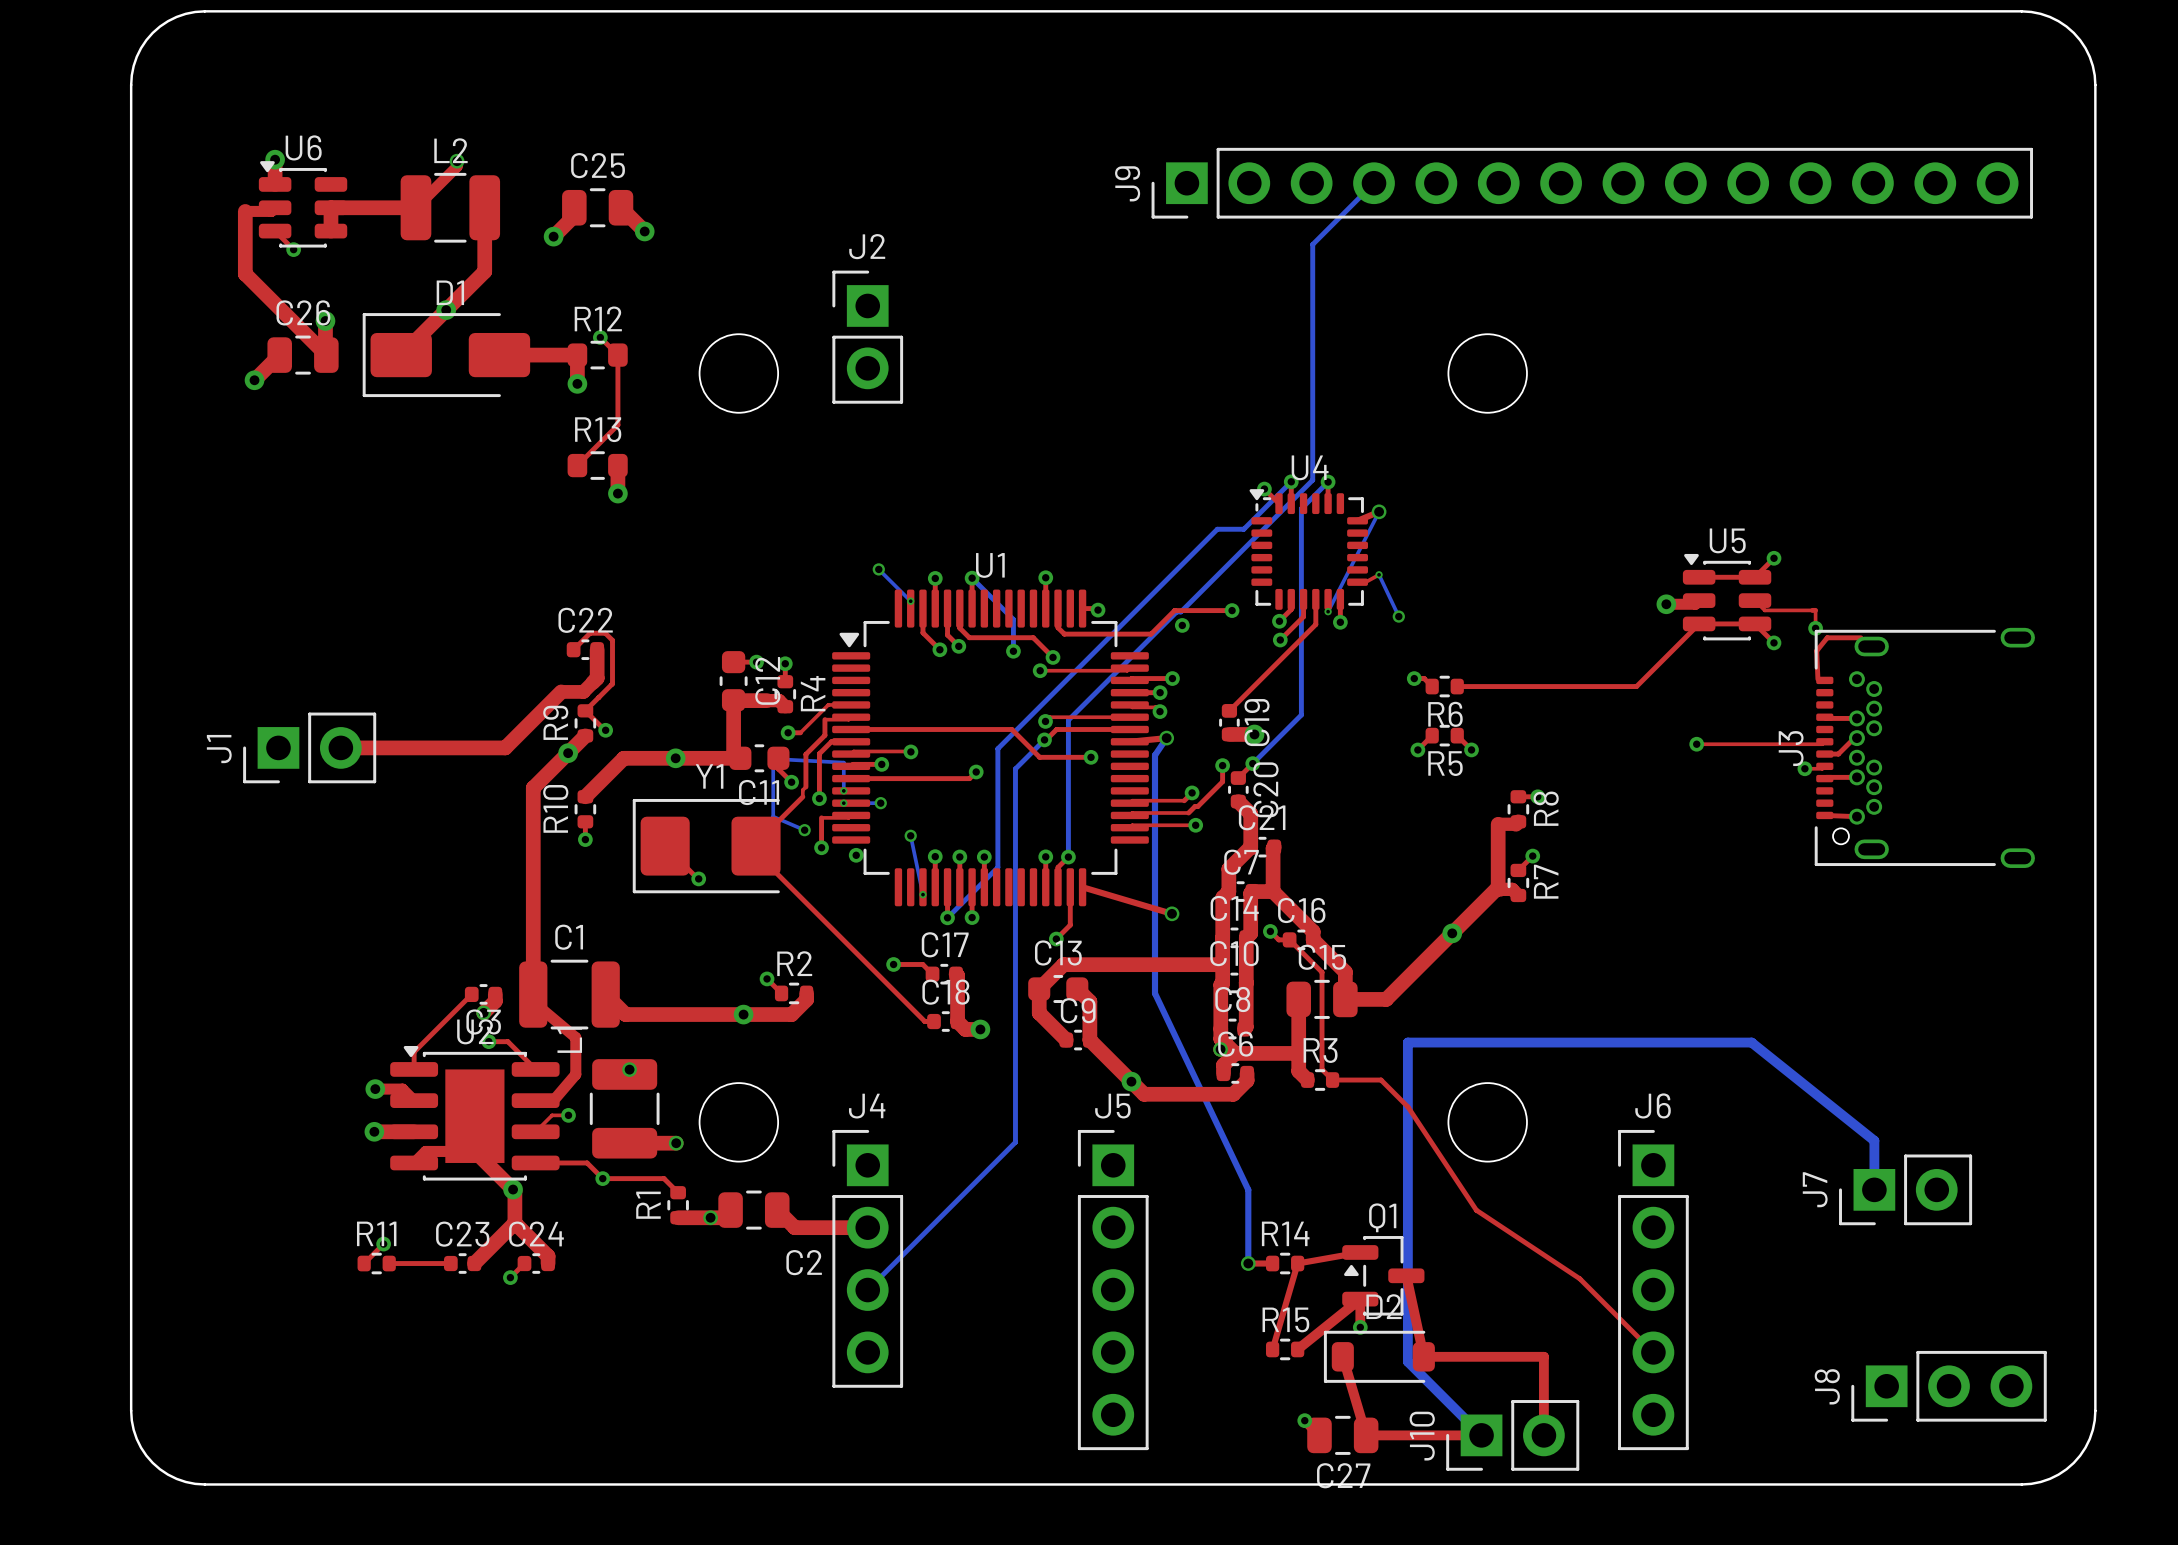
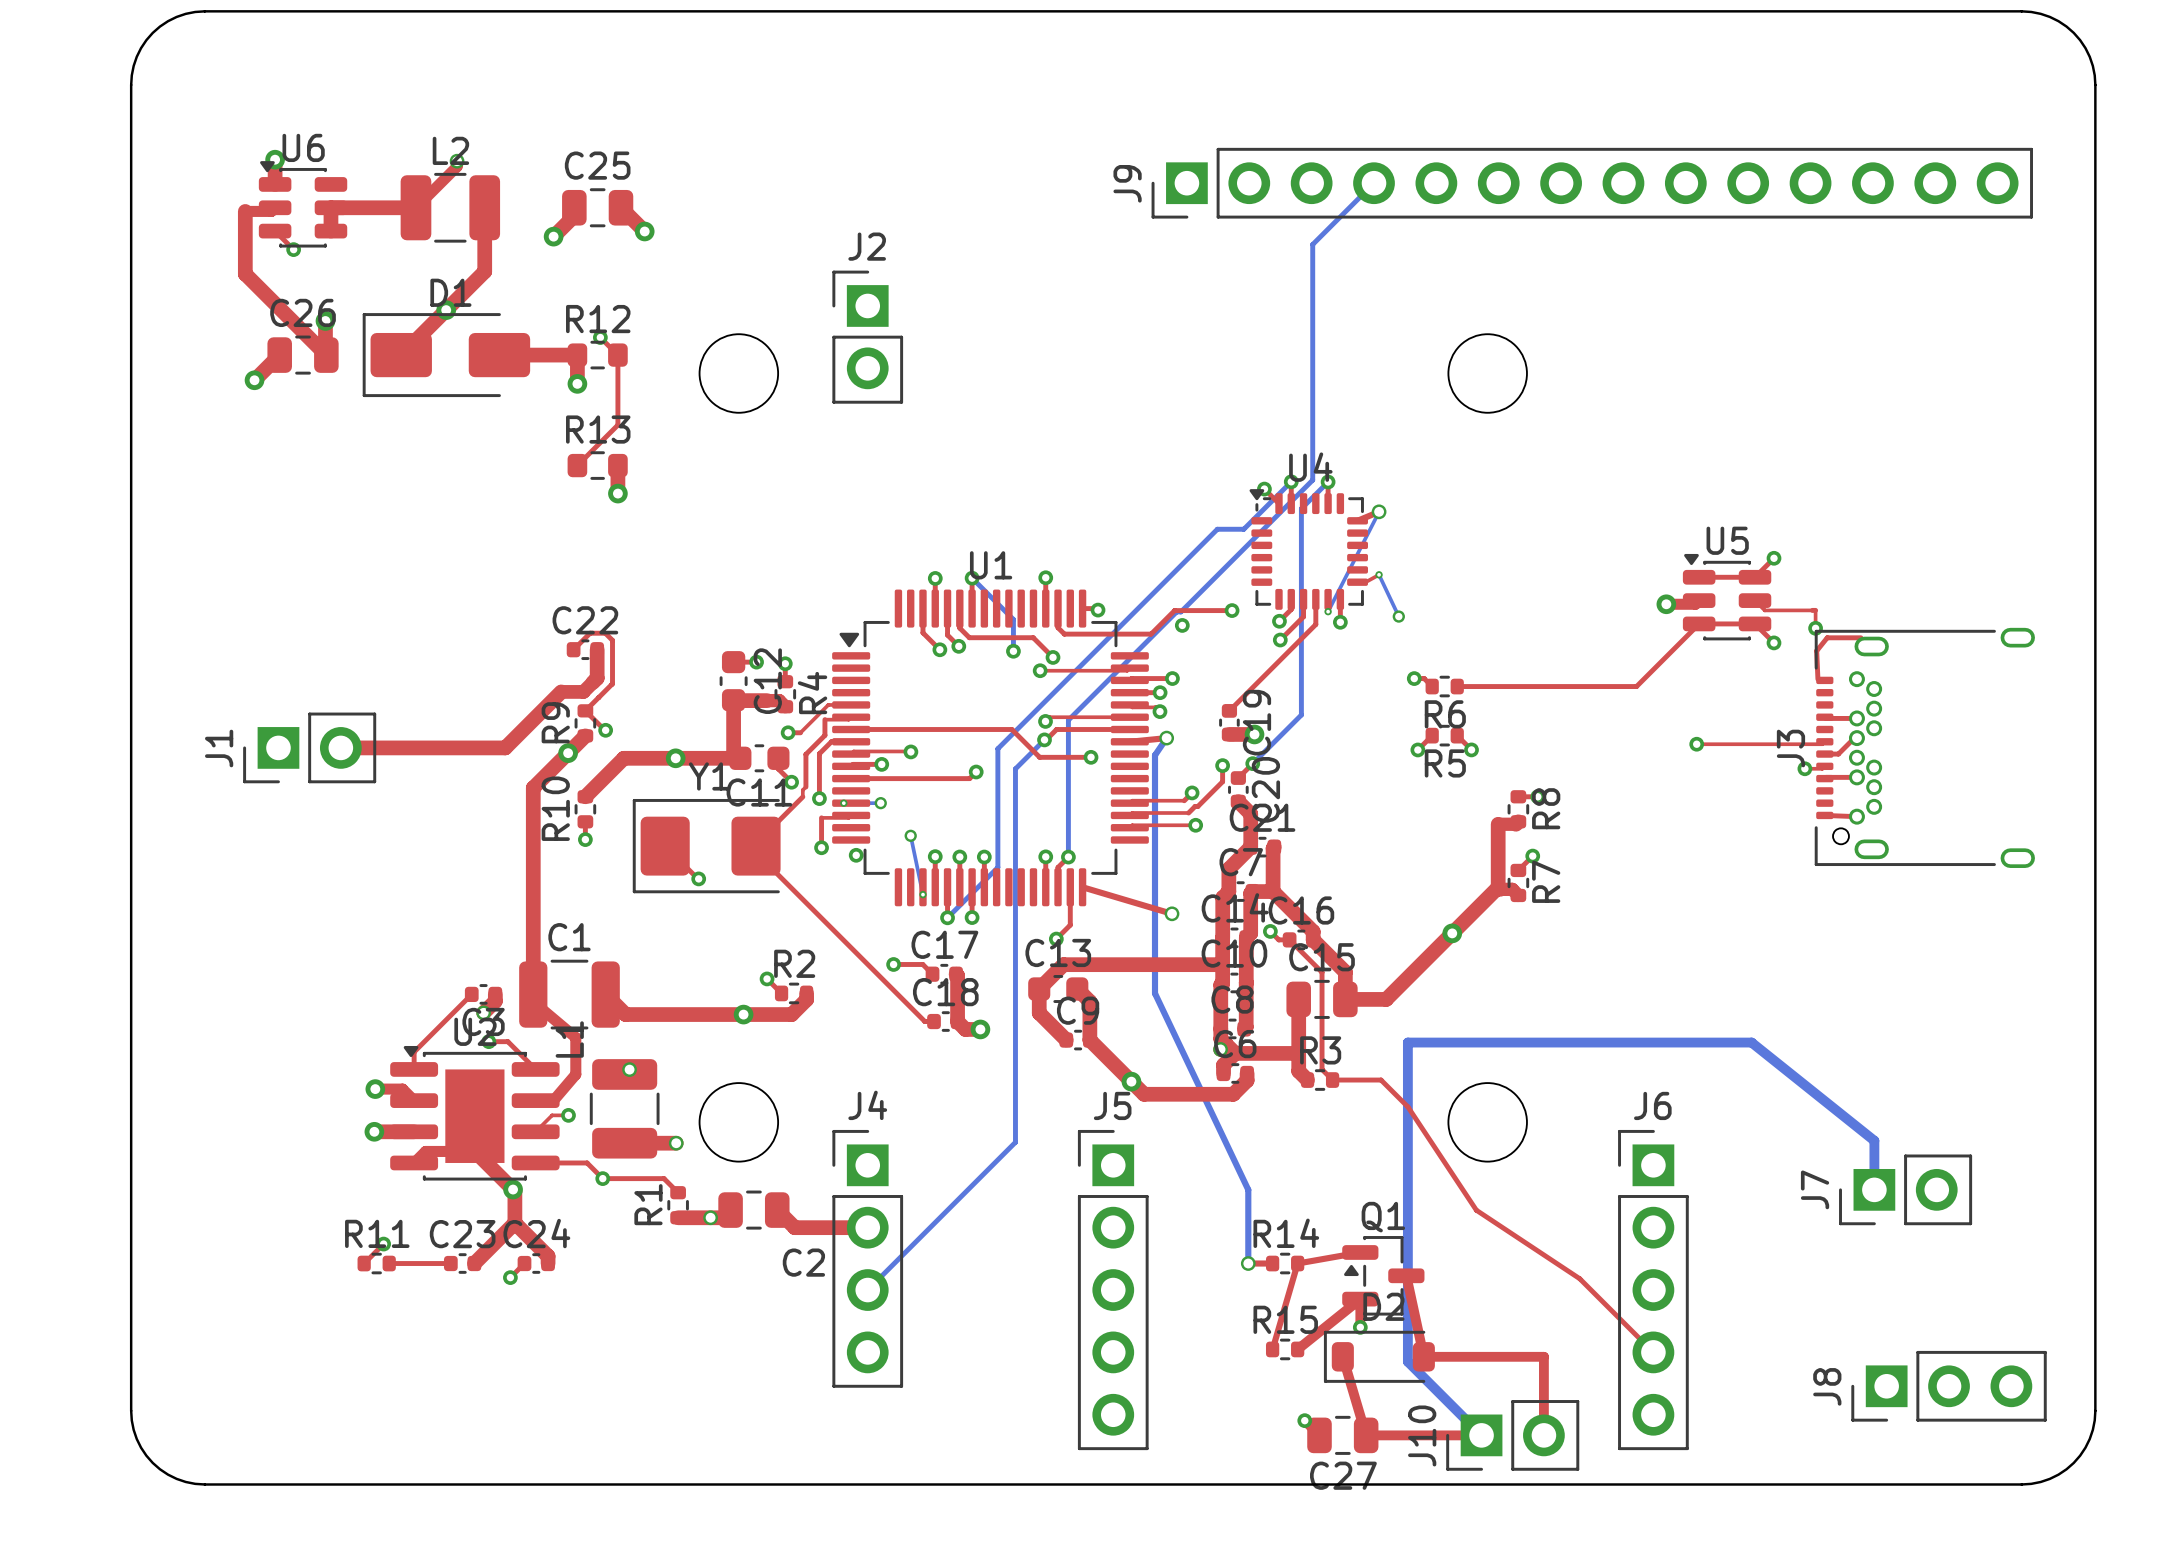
bottom track: (878, 569) (910, 601) -> none
via: (878, 569) -> none
via: (910, 601) -> none
bottom track: (843, 790) (843, 762) (773, 758) (773, 816) (804, 830) -> none
via: (843, 790) -> none
via: (804, 830) -> none

